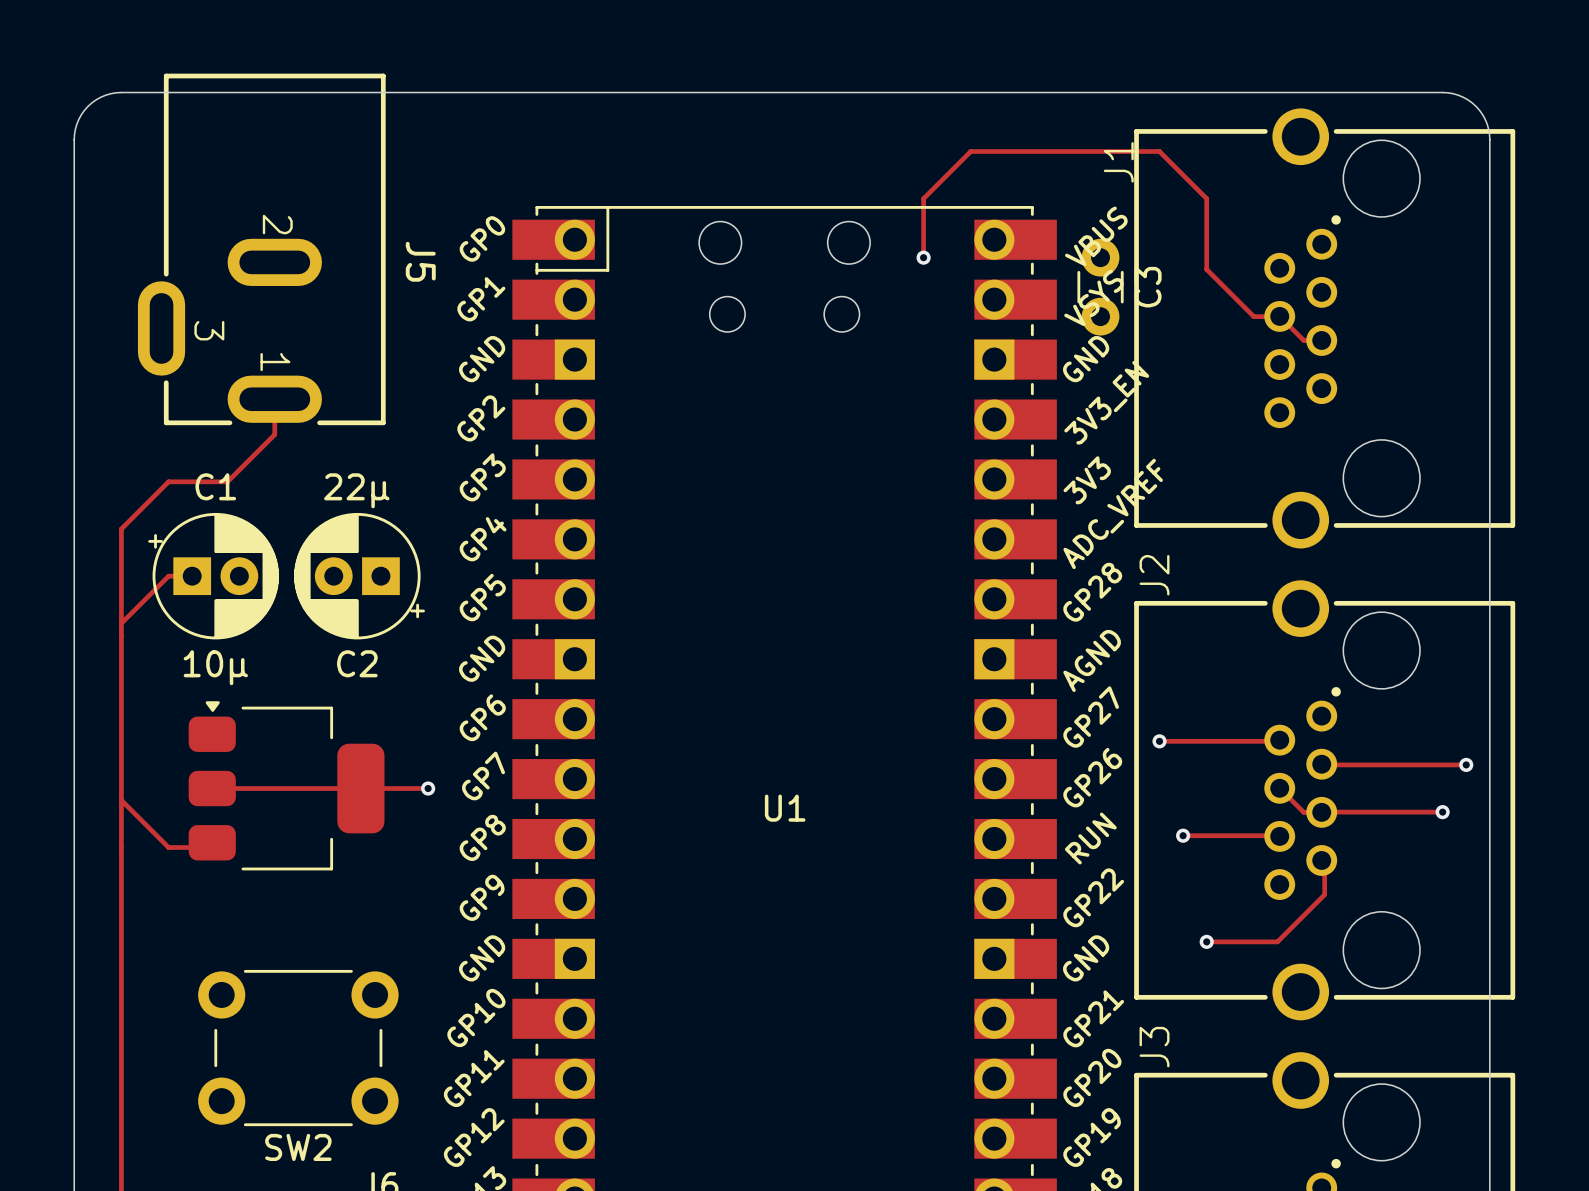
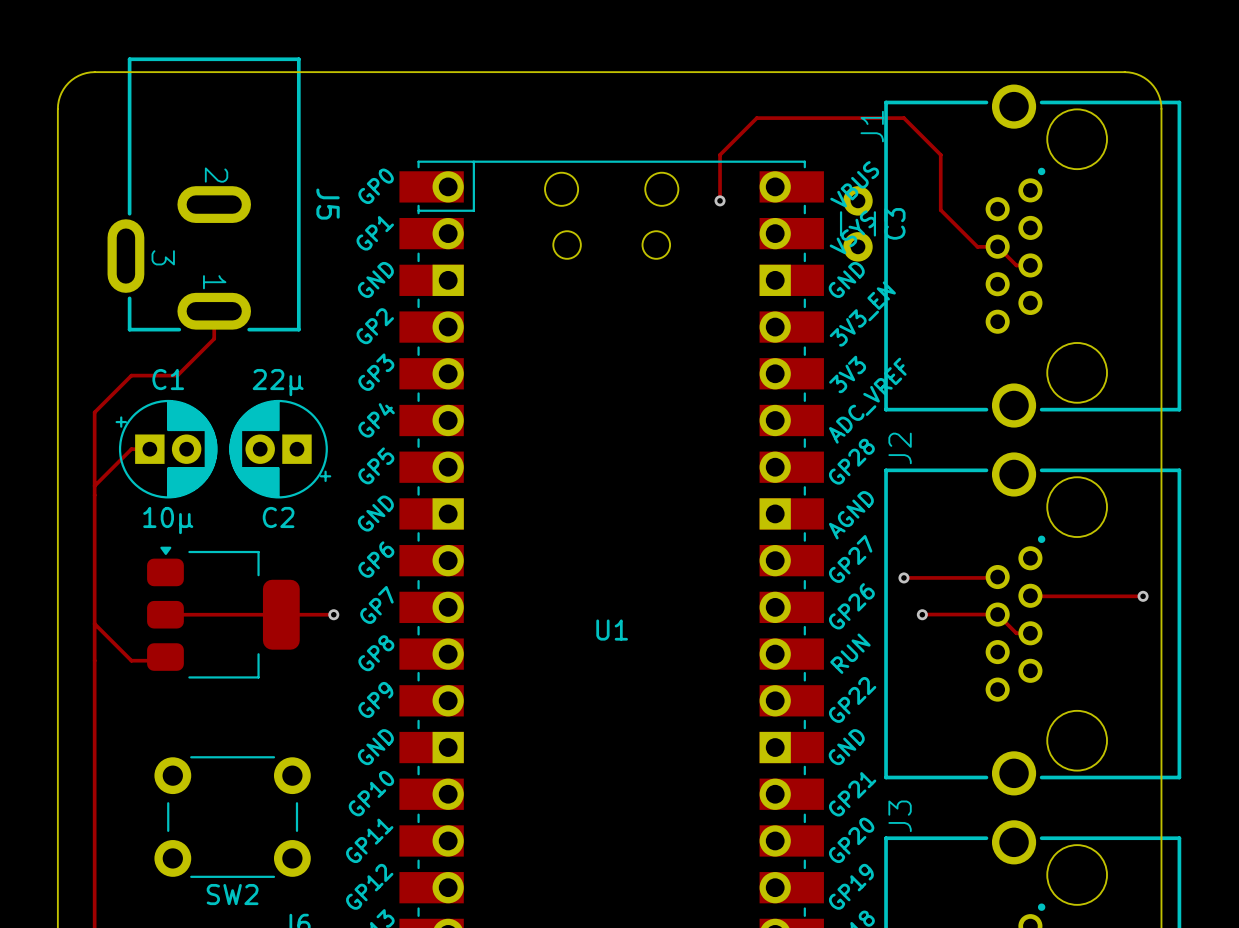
track: (1321, 812) (1442, 812) -> none
via: (1442, 812) -> none
track: (1183, 835) (1279, 835) -> (922, 614) (997, 614)
via position: (1183, 835) -> (922, 614)
track: (1321, 860) (1324, 863) (1324, 894) (1277, 941) (1206, 941) -> none
via: (1206, 941) -> none

